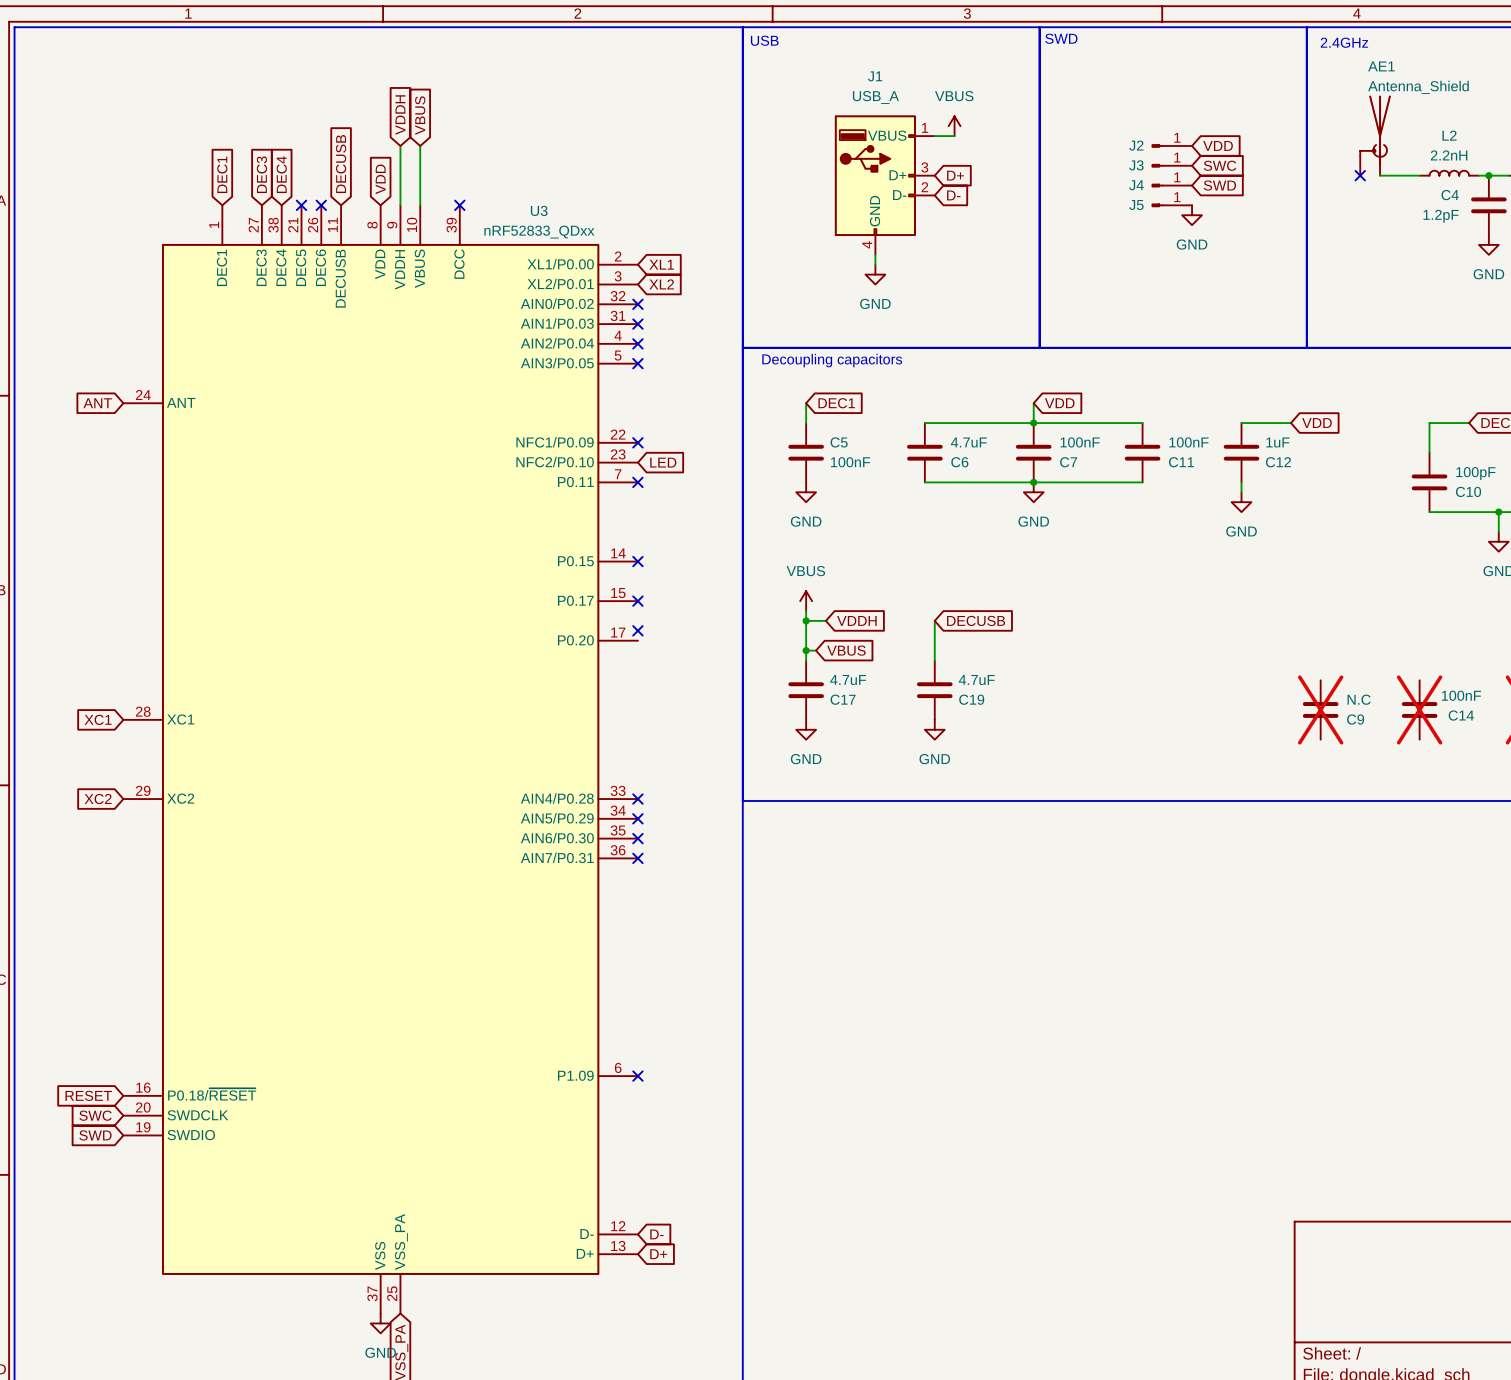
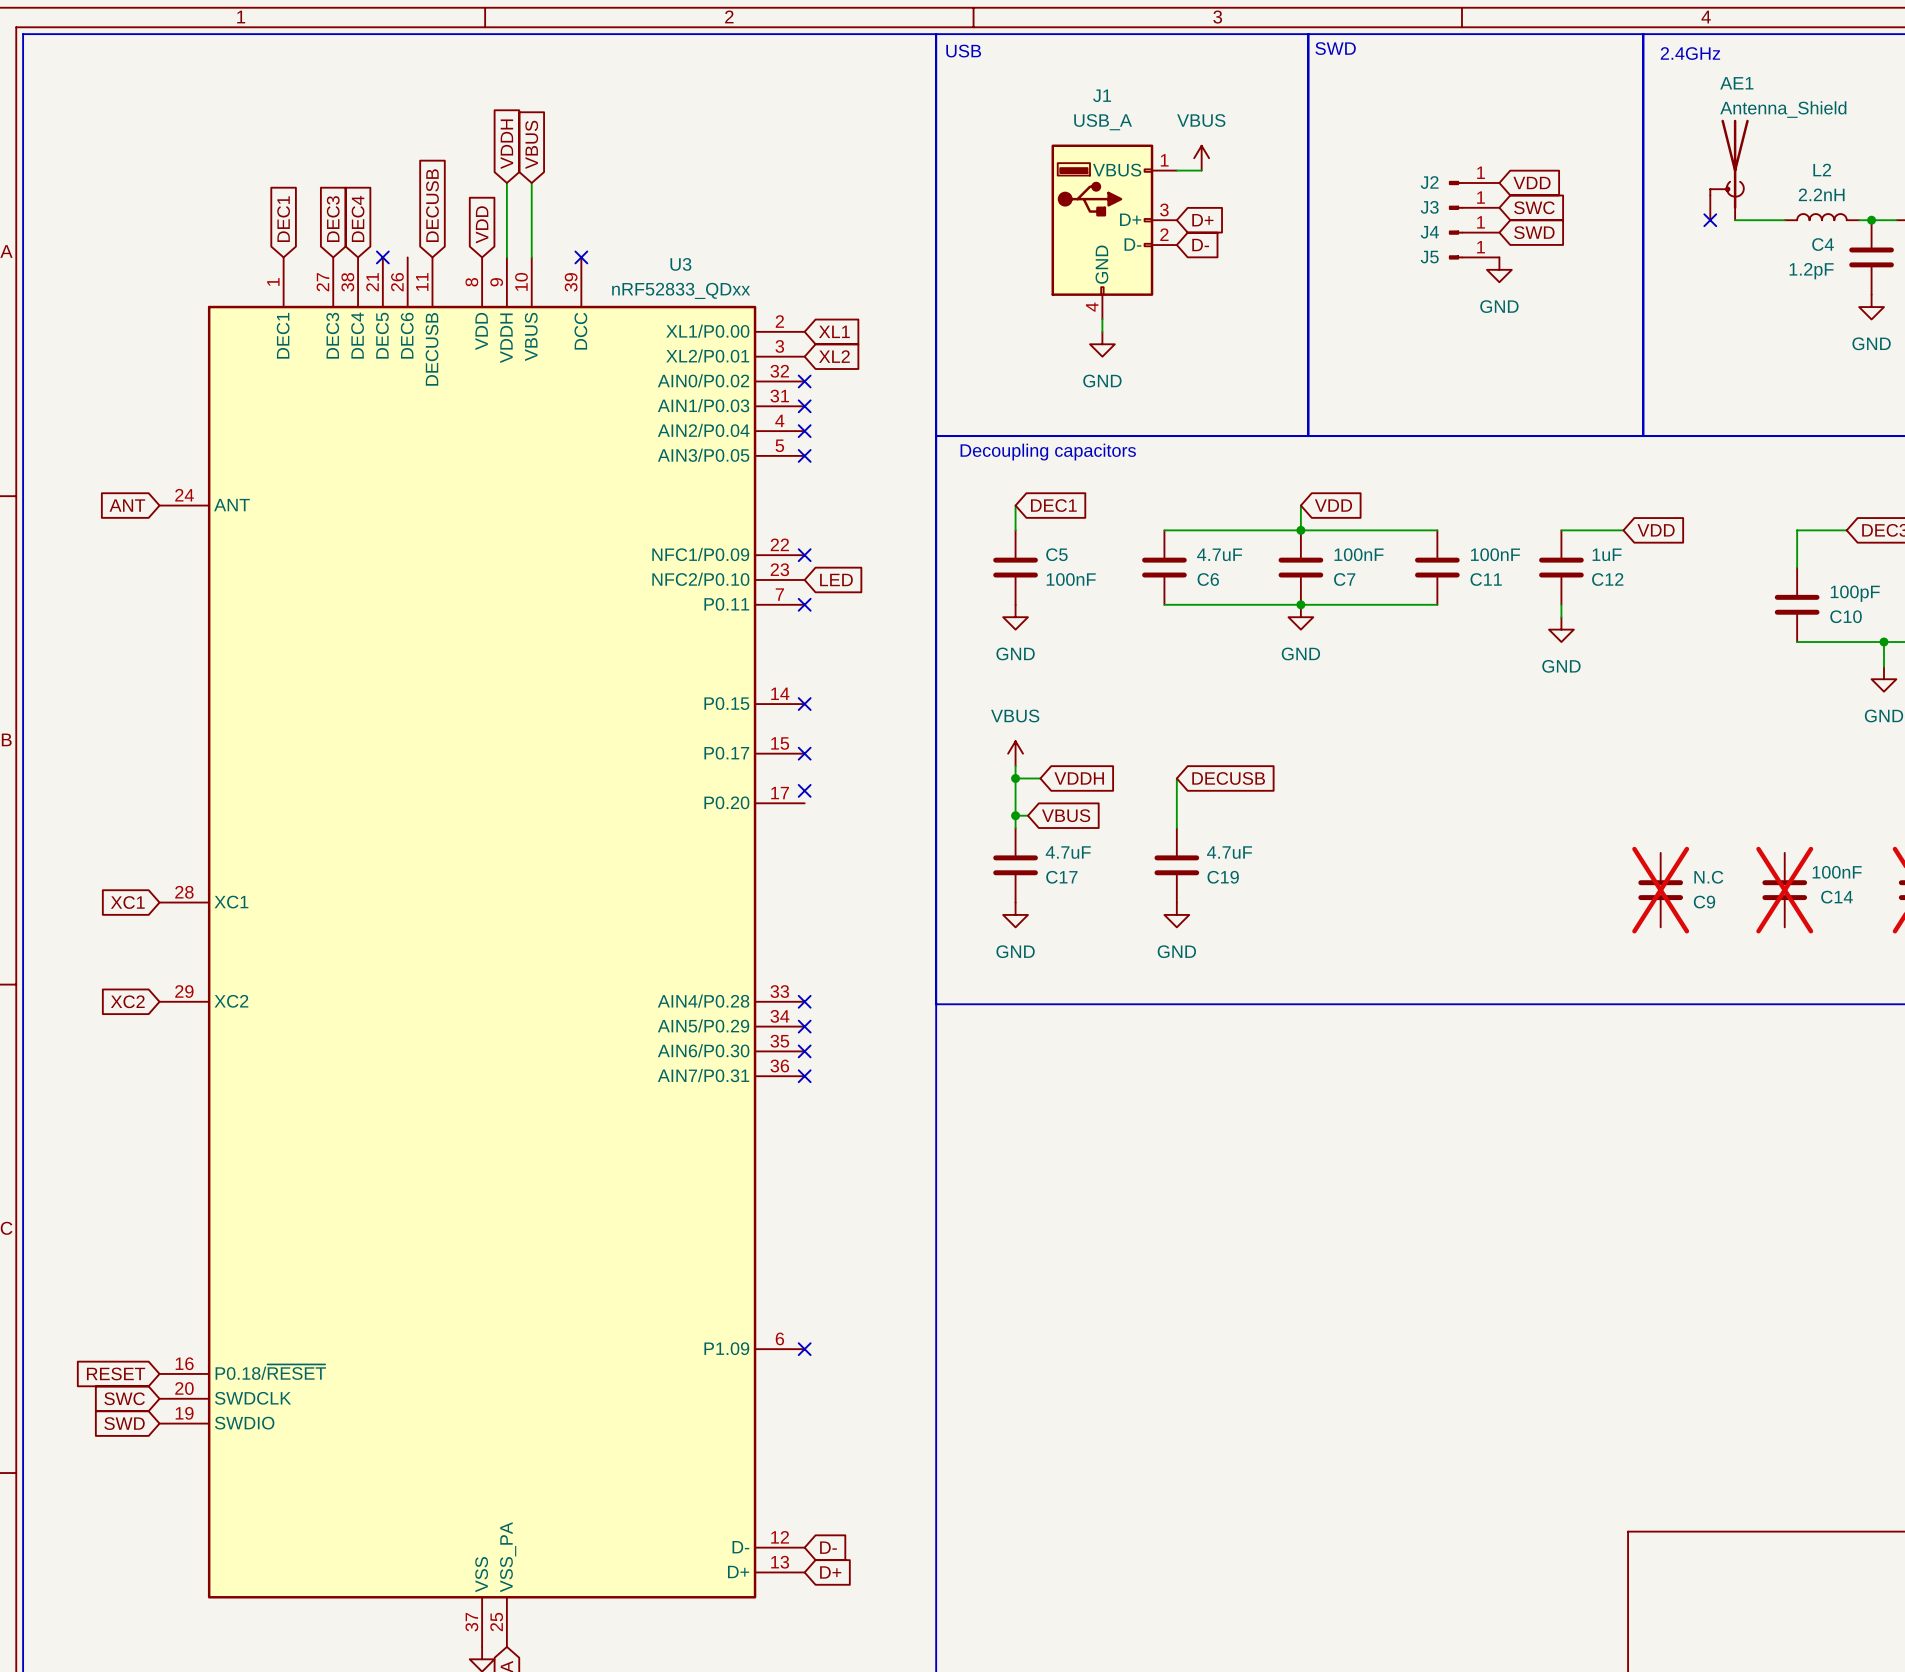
no-connect mark: (321, 205) -> none

